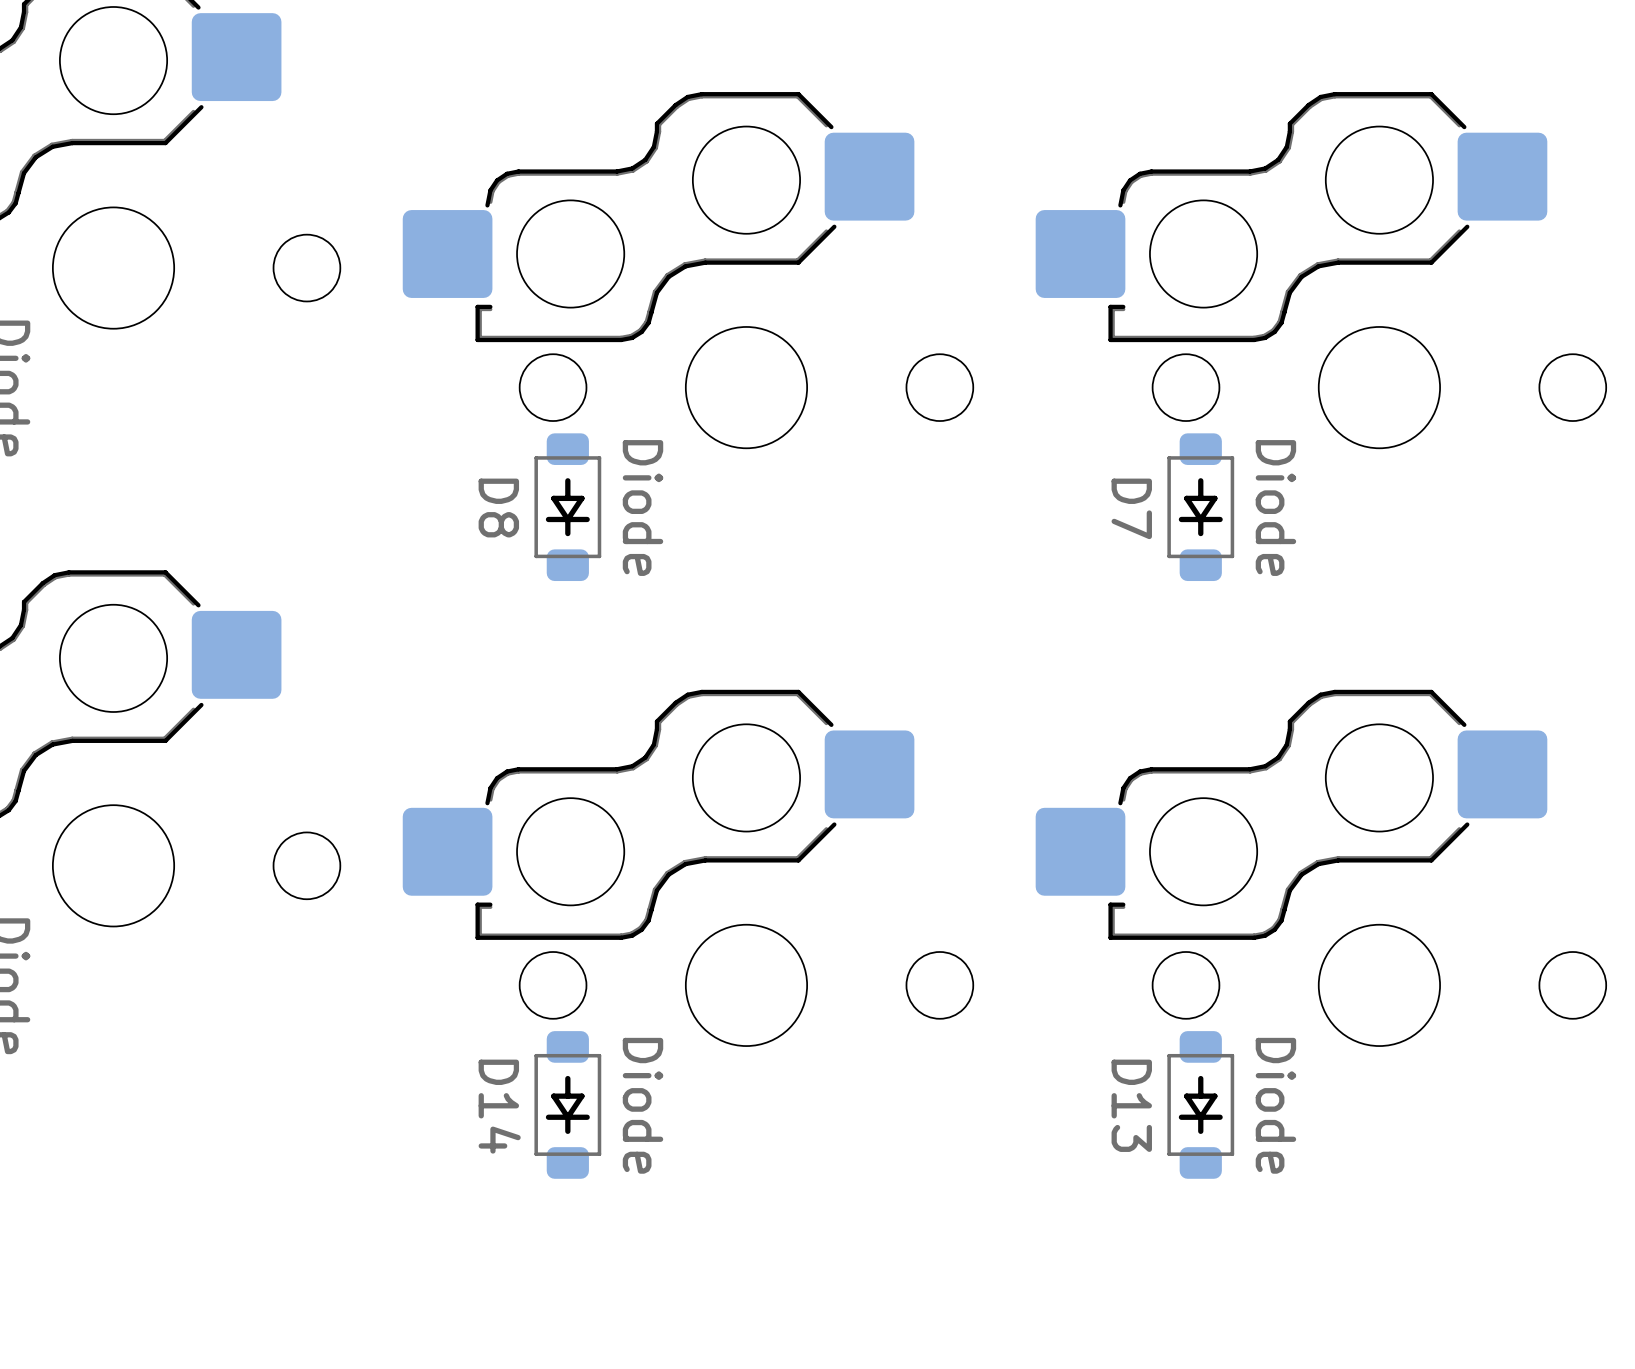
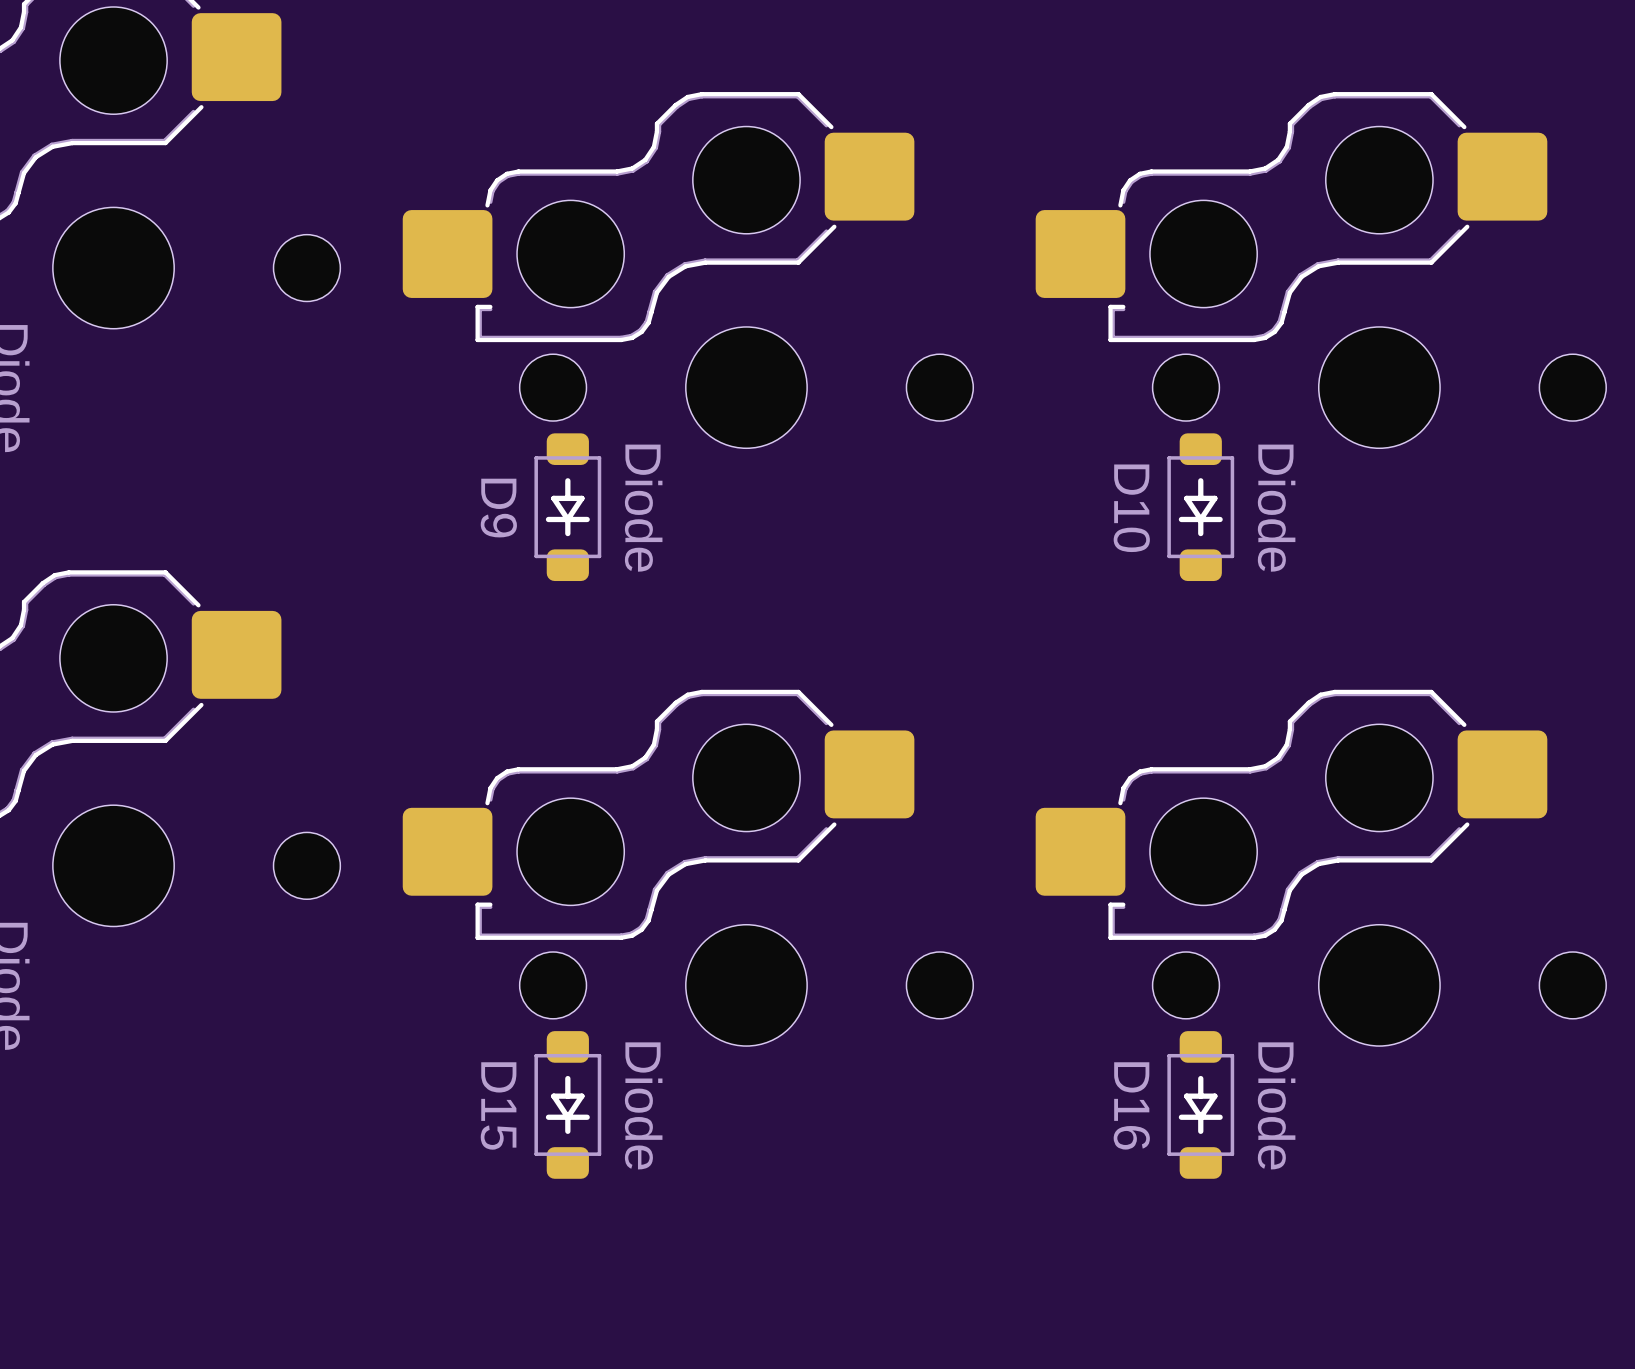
D8 name: D8 (498, 508) -> D9 (498, 508)
D7 name: D7 (1131, 508) -> D10 (1131, 508)
D13 name: D13 (1131, 1105) -> D16 (1131, 1105)
D14 name: D14 (499, 1106) -> D15 (498, 1105)

